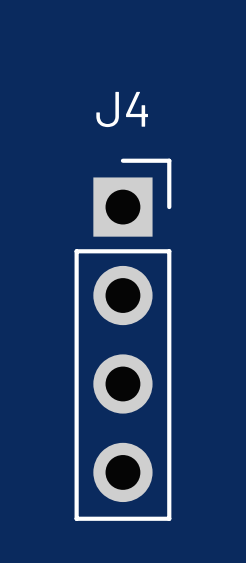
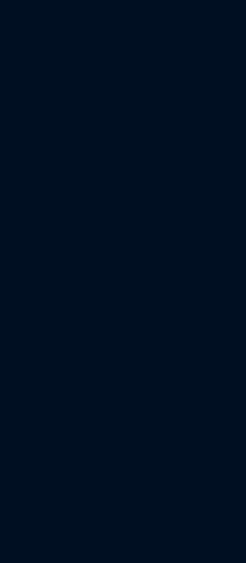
J4: (122, 339) -> none

